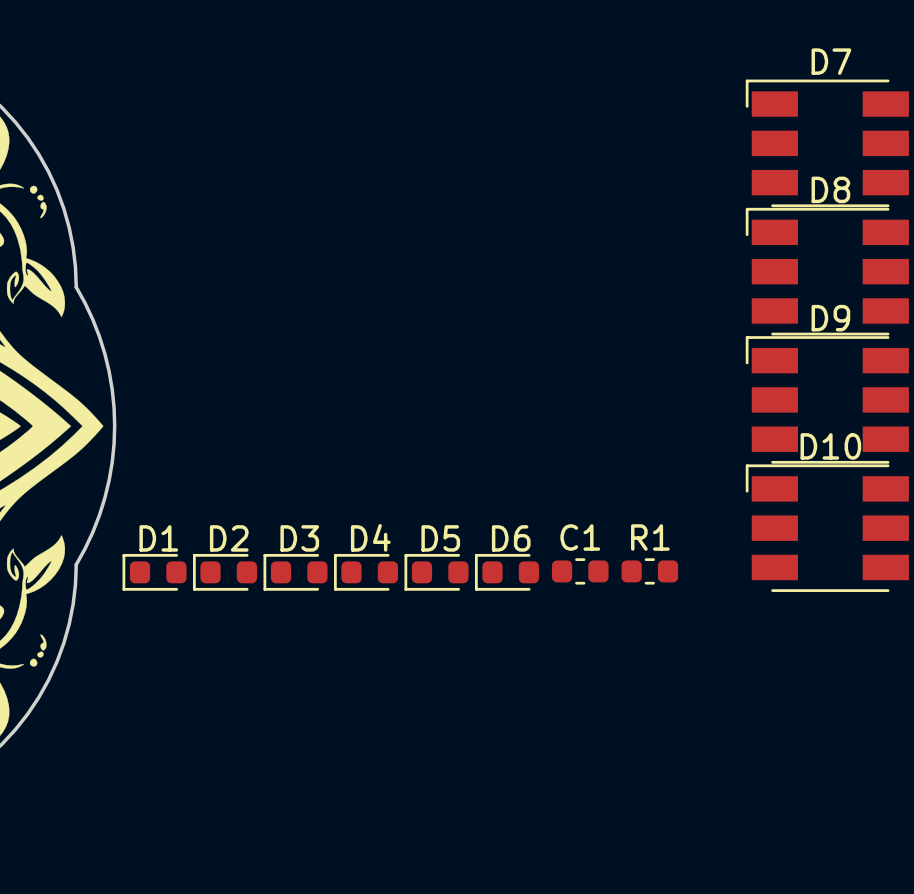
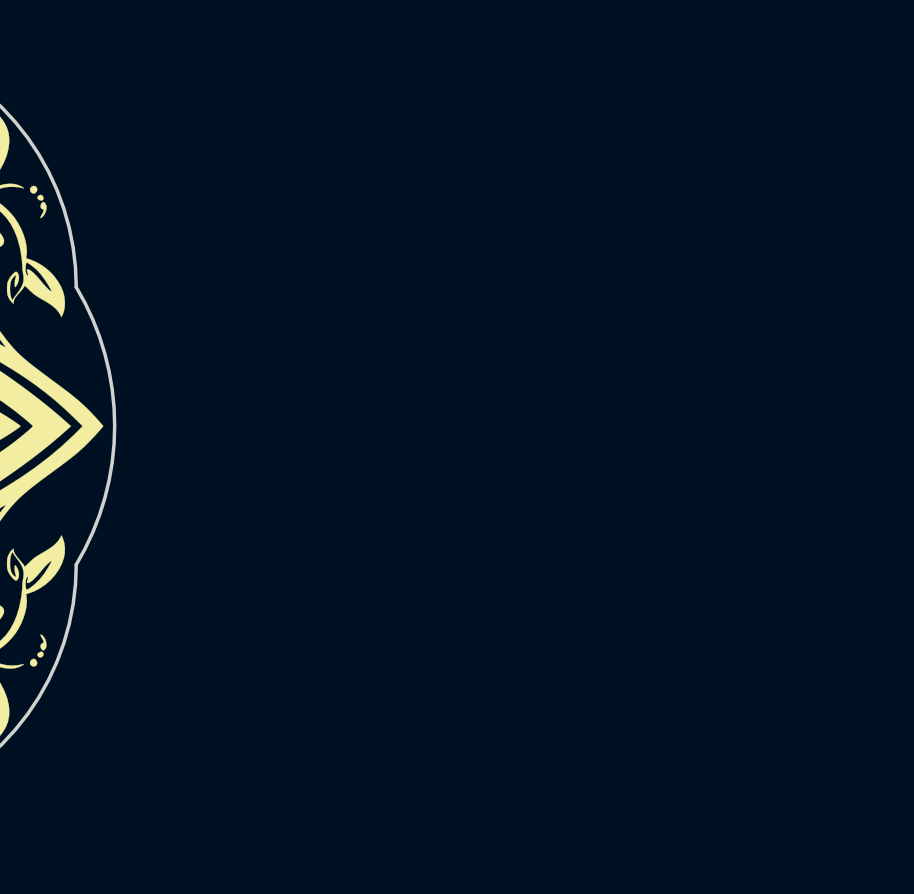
D7: (827, 143) -> none
D8: (827, 271) -> none
D9: (827, 399) -> none
D10: (827, 528) -> none
C1: (580, 571) -> none
R1: (649, 571) -> none
D1: (154, 572) -> none
D2: (225, 572) -> none
D3: (295, 572) -> none
D4: (366, 572) -> none
D5: (436, 572) -> none
D6: (506, 572) -> none

